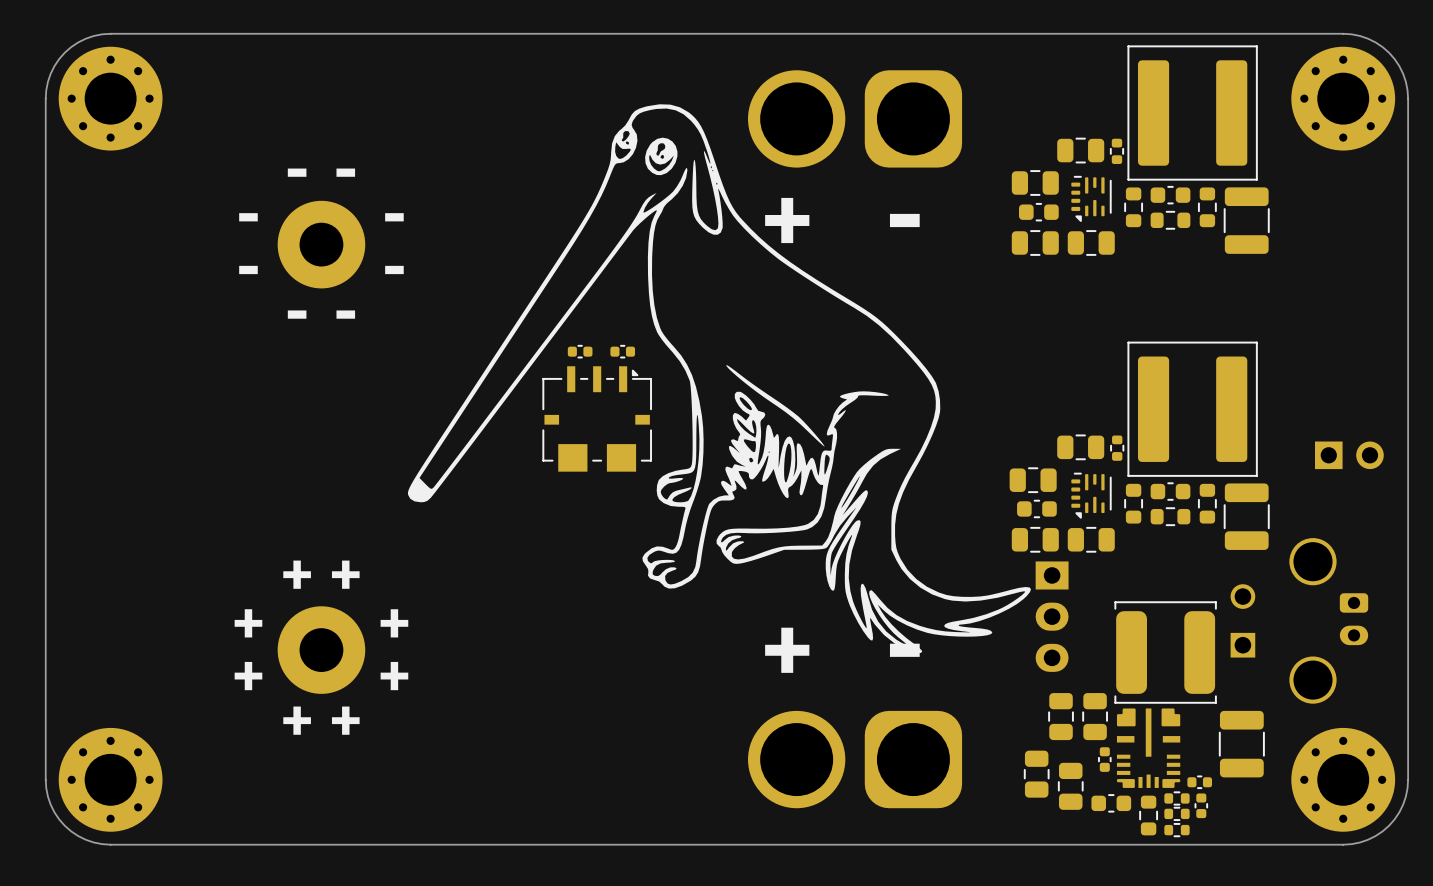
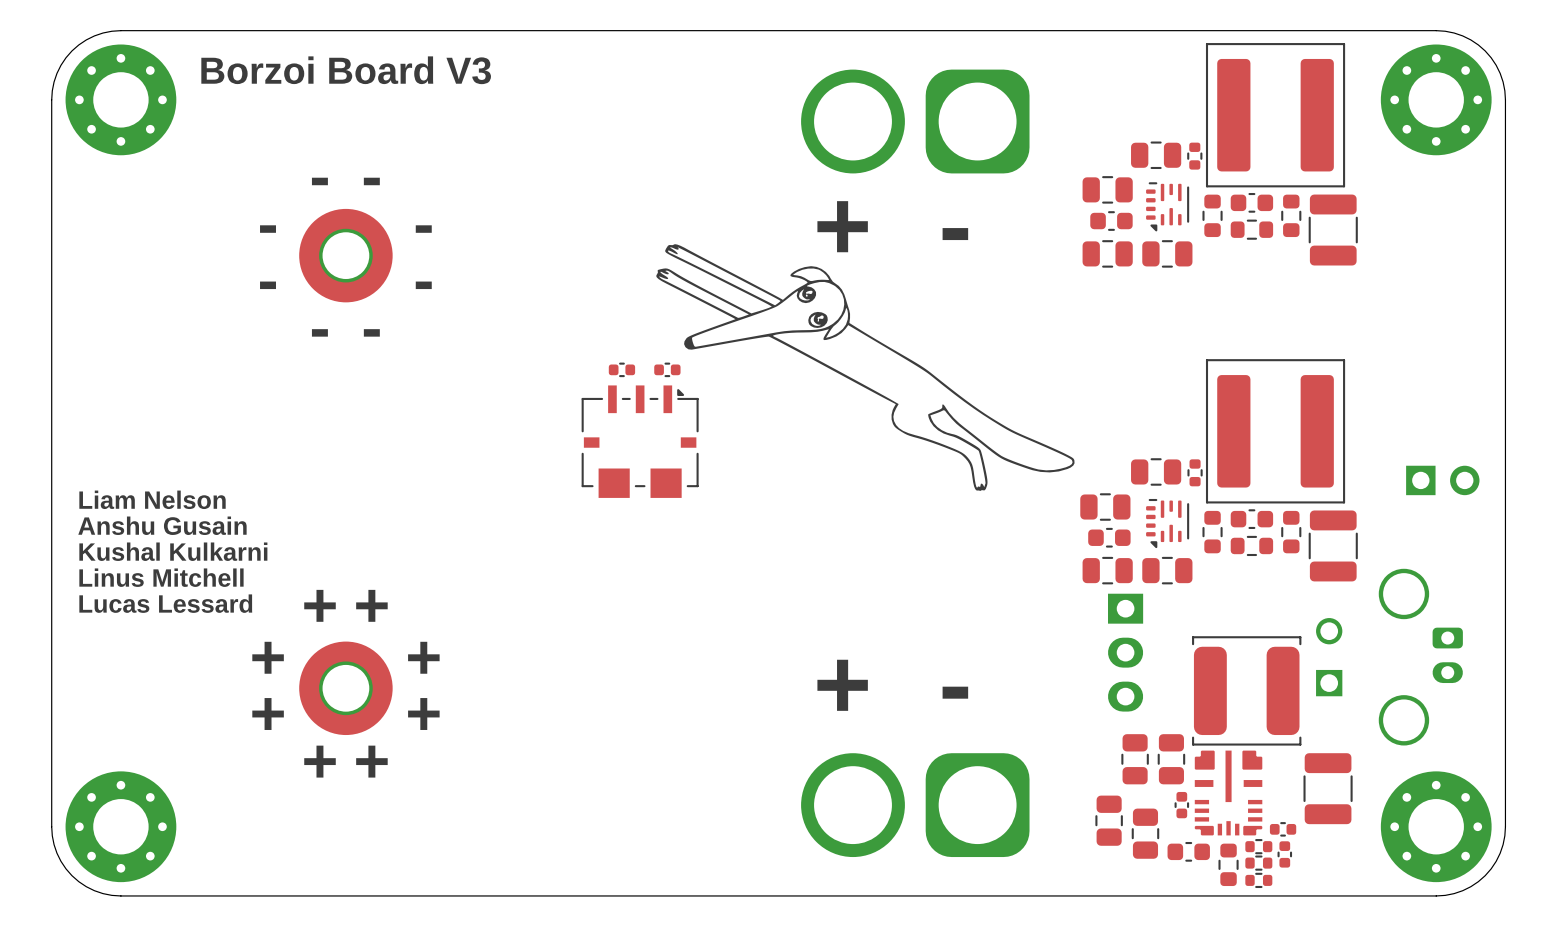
text: none -> Borzoi Board V3 (346, 70)
drawing: [407, 104, 1031, 654] -> none
drawing: none -> [656, 244, 1075, 492]
text: none -> Liam Nelson (152, 499)
text: none -> Anshu Gusain (162, 525)
text: none -> Kushal Kulkarni (173, 551)
text: none -> Linus Mitchell (161, 577)
text: none -> Lucas Lessard (165, 603)

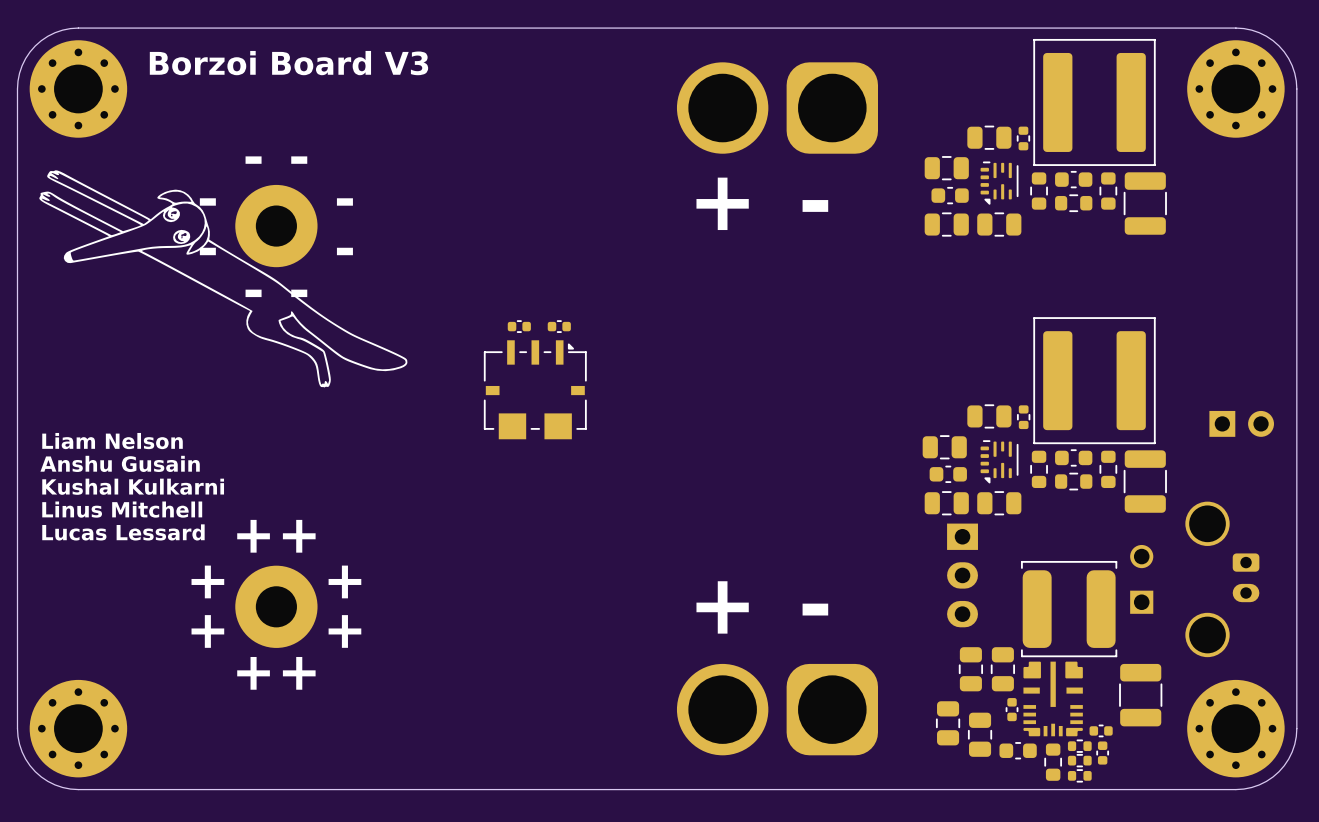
drawing: none -> [39, 170, 408, 388]
drawing: [656, 244, 1075, 492] -> none

